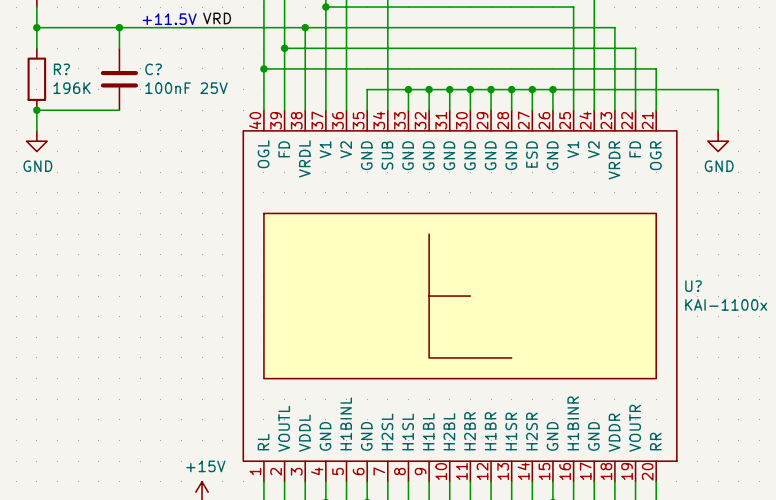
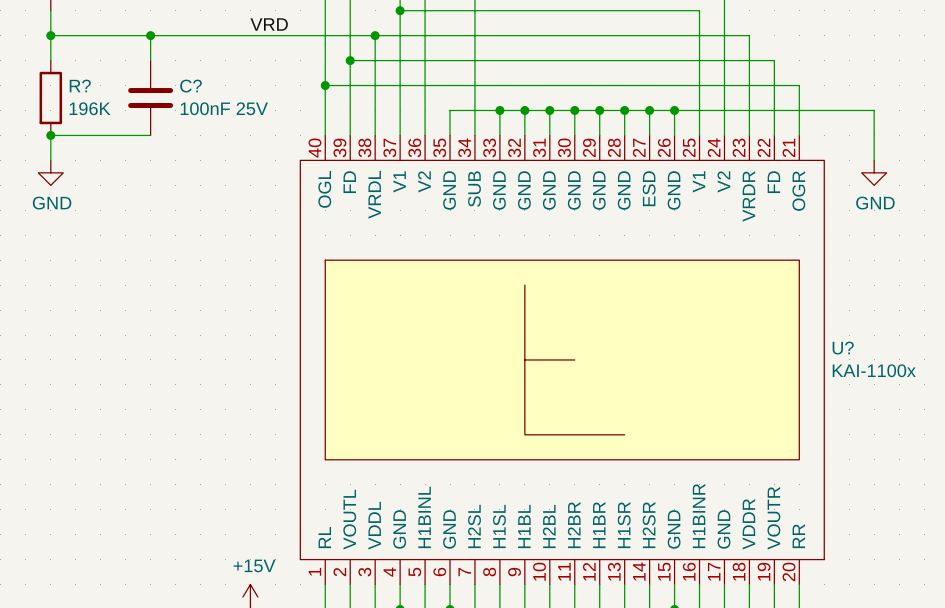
text: +11.5V (169, 19) -> none

